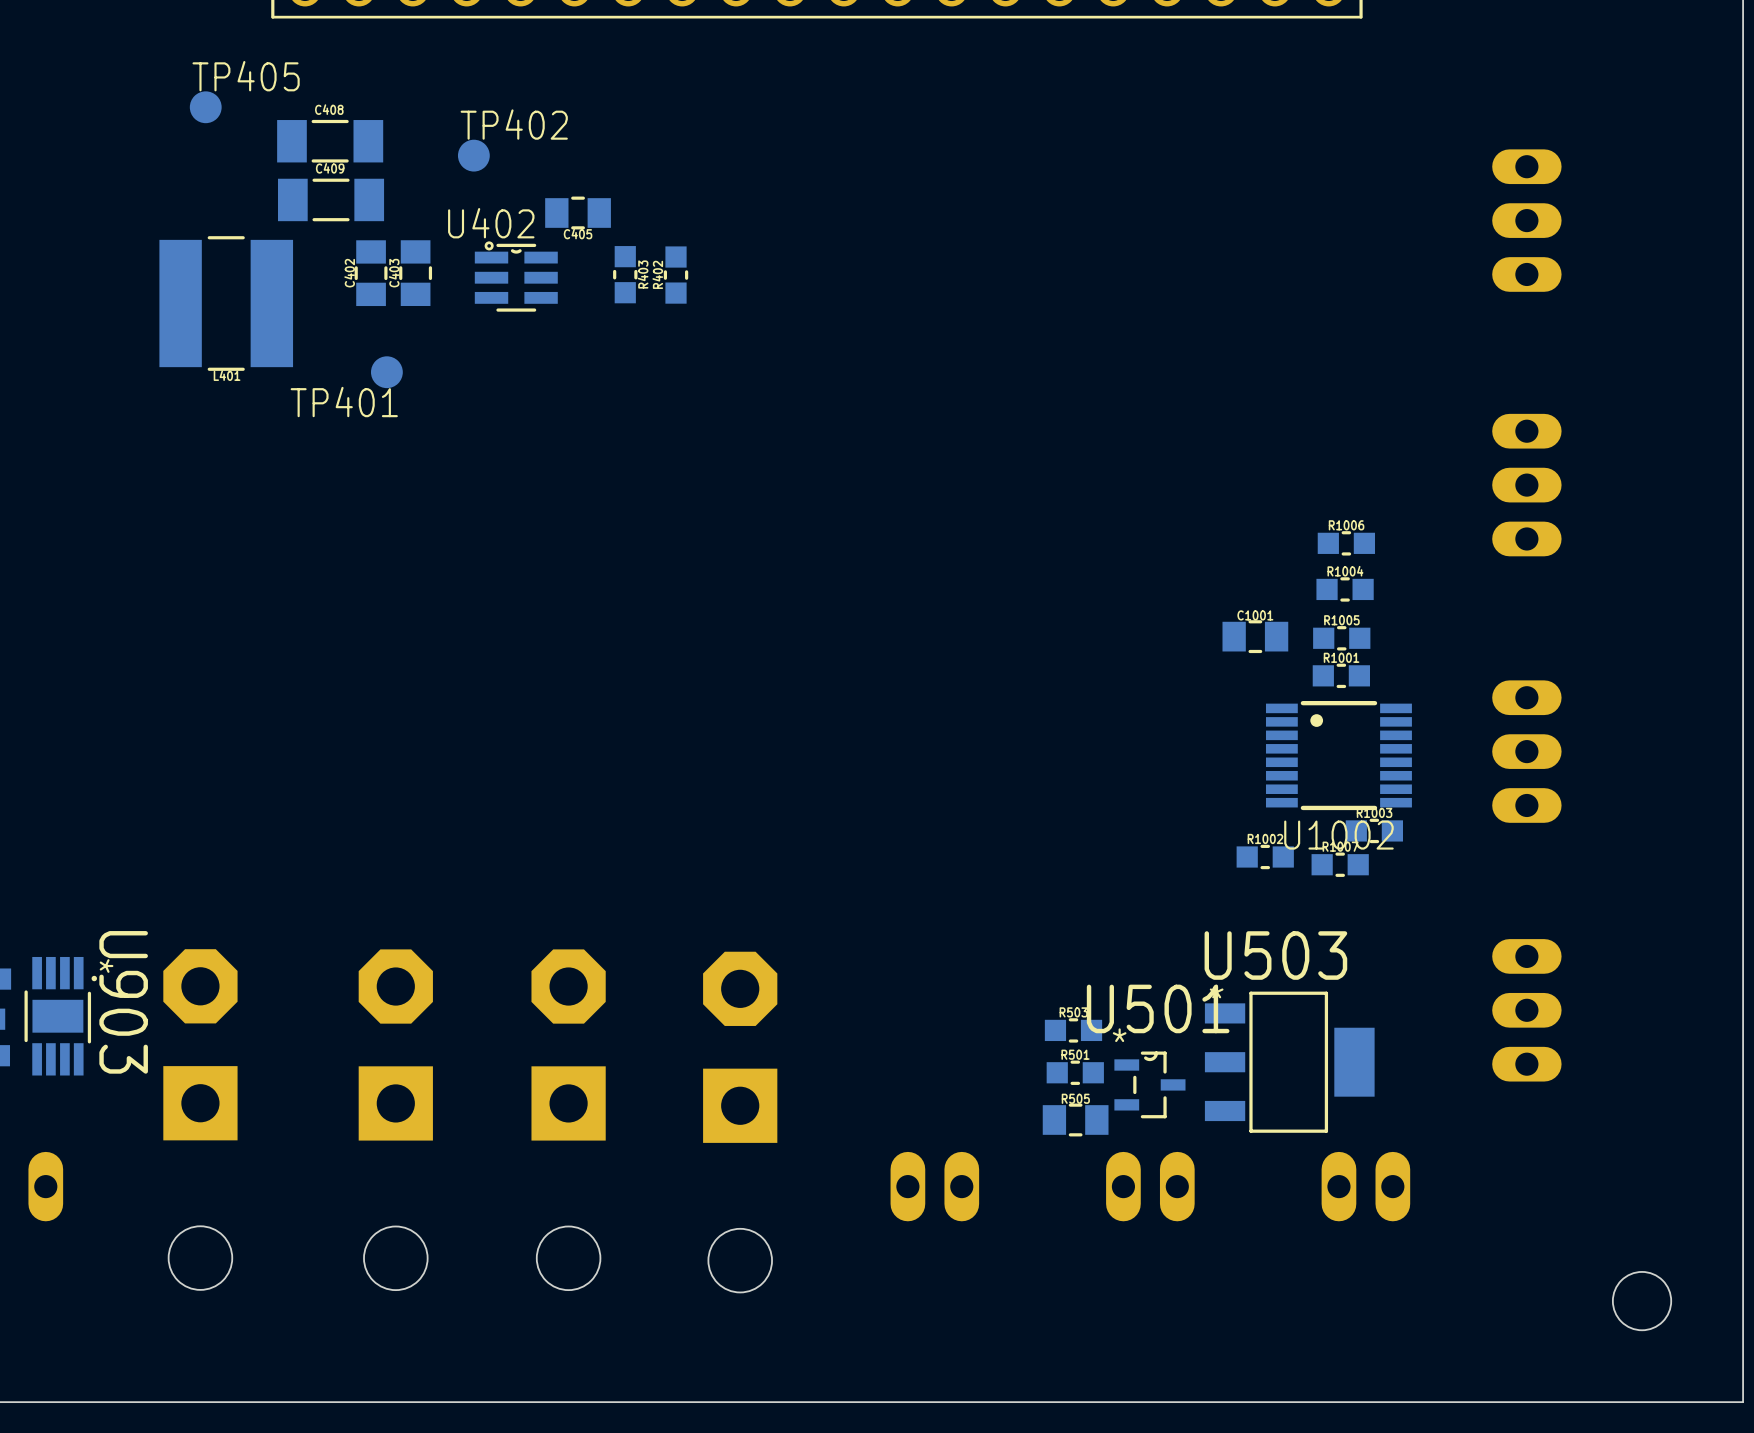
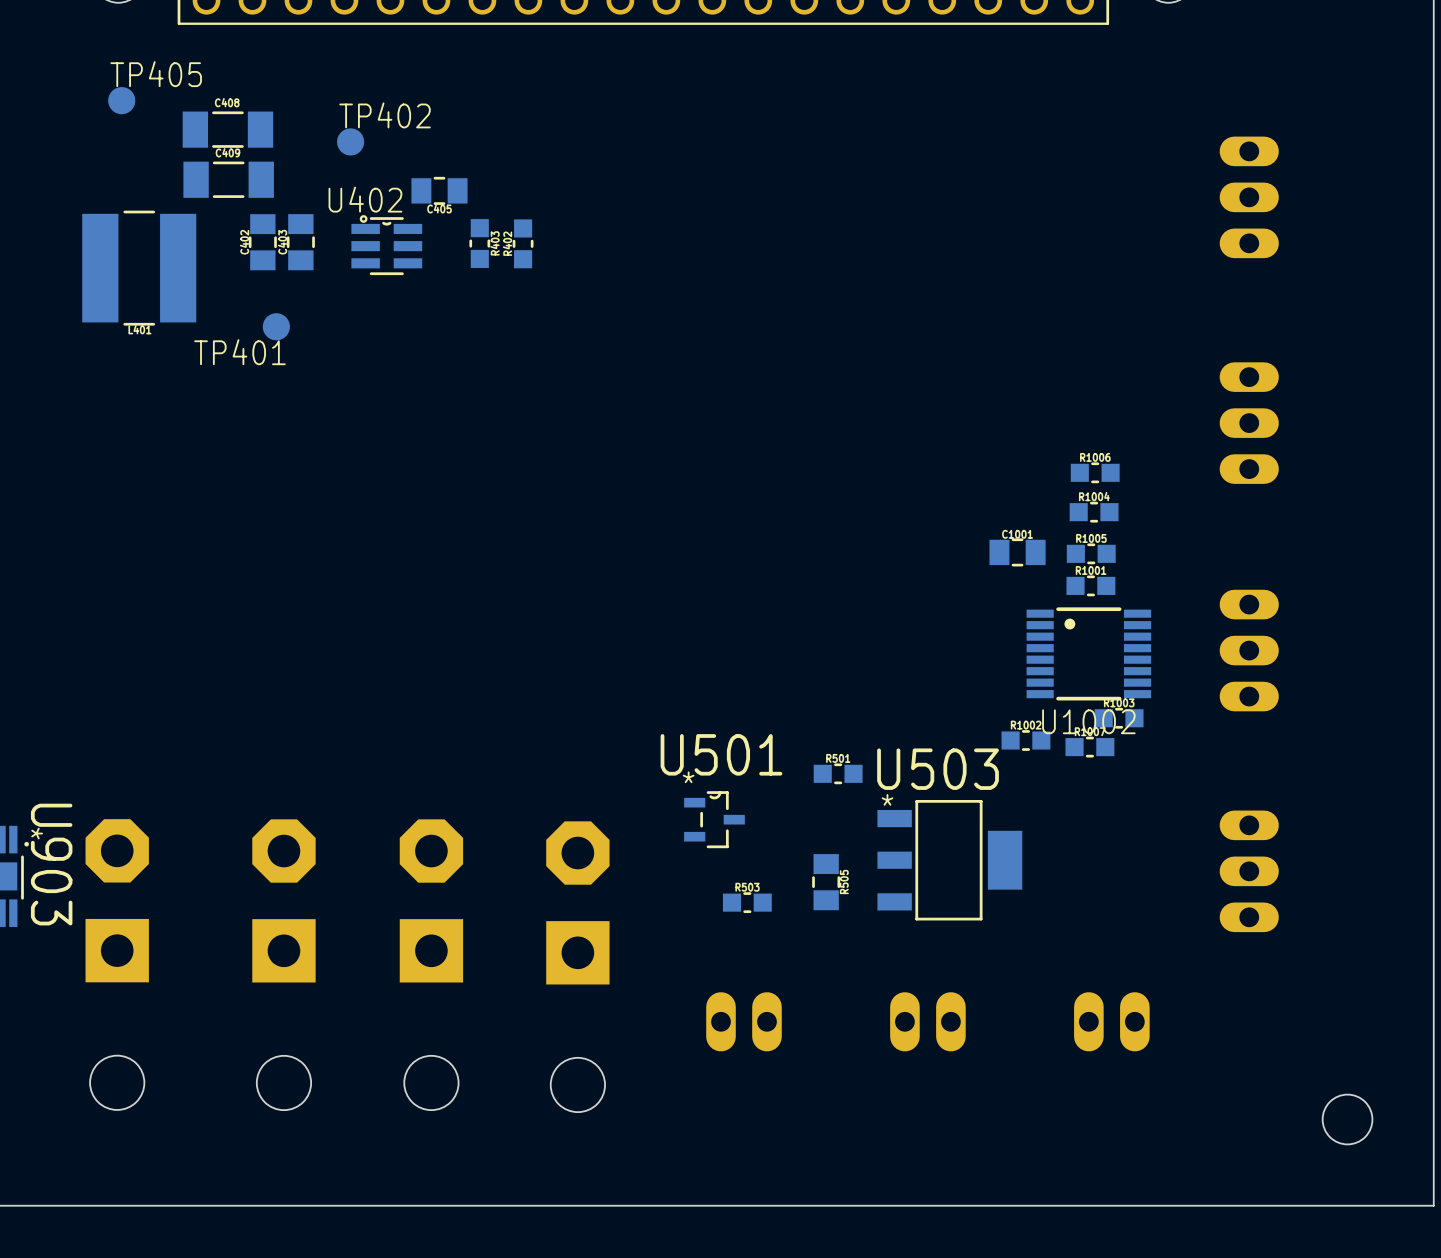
R503 position: (1073, 1030) -> (747, 902)
U503 position: (1289, 1062) -> (949, 860)
R501 position: (1075, 1072) -> (838, 773)
U501 position: (1149, 1084) -> (714, 819)
R505 rotation: 0° (1075, 1119) -> 90° clockwise (826, 882)
R505 position: (1075, 1119) -> (826, 882)

